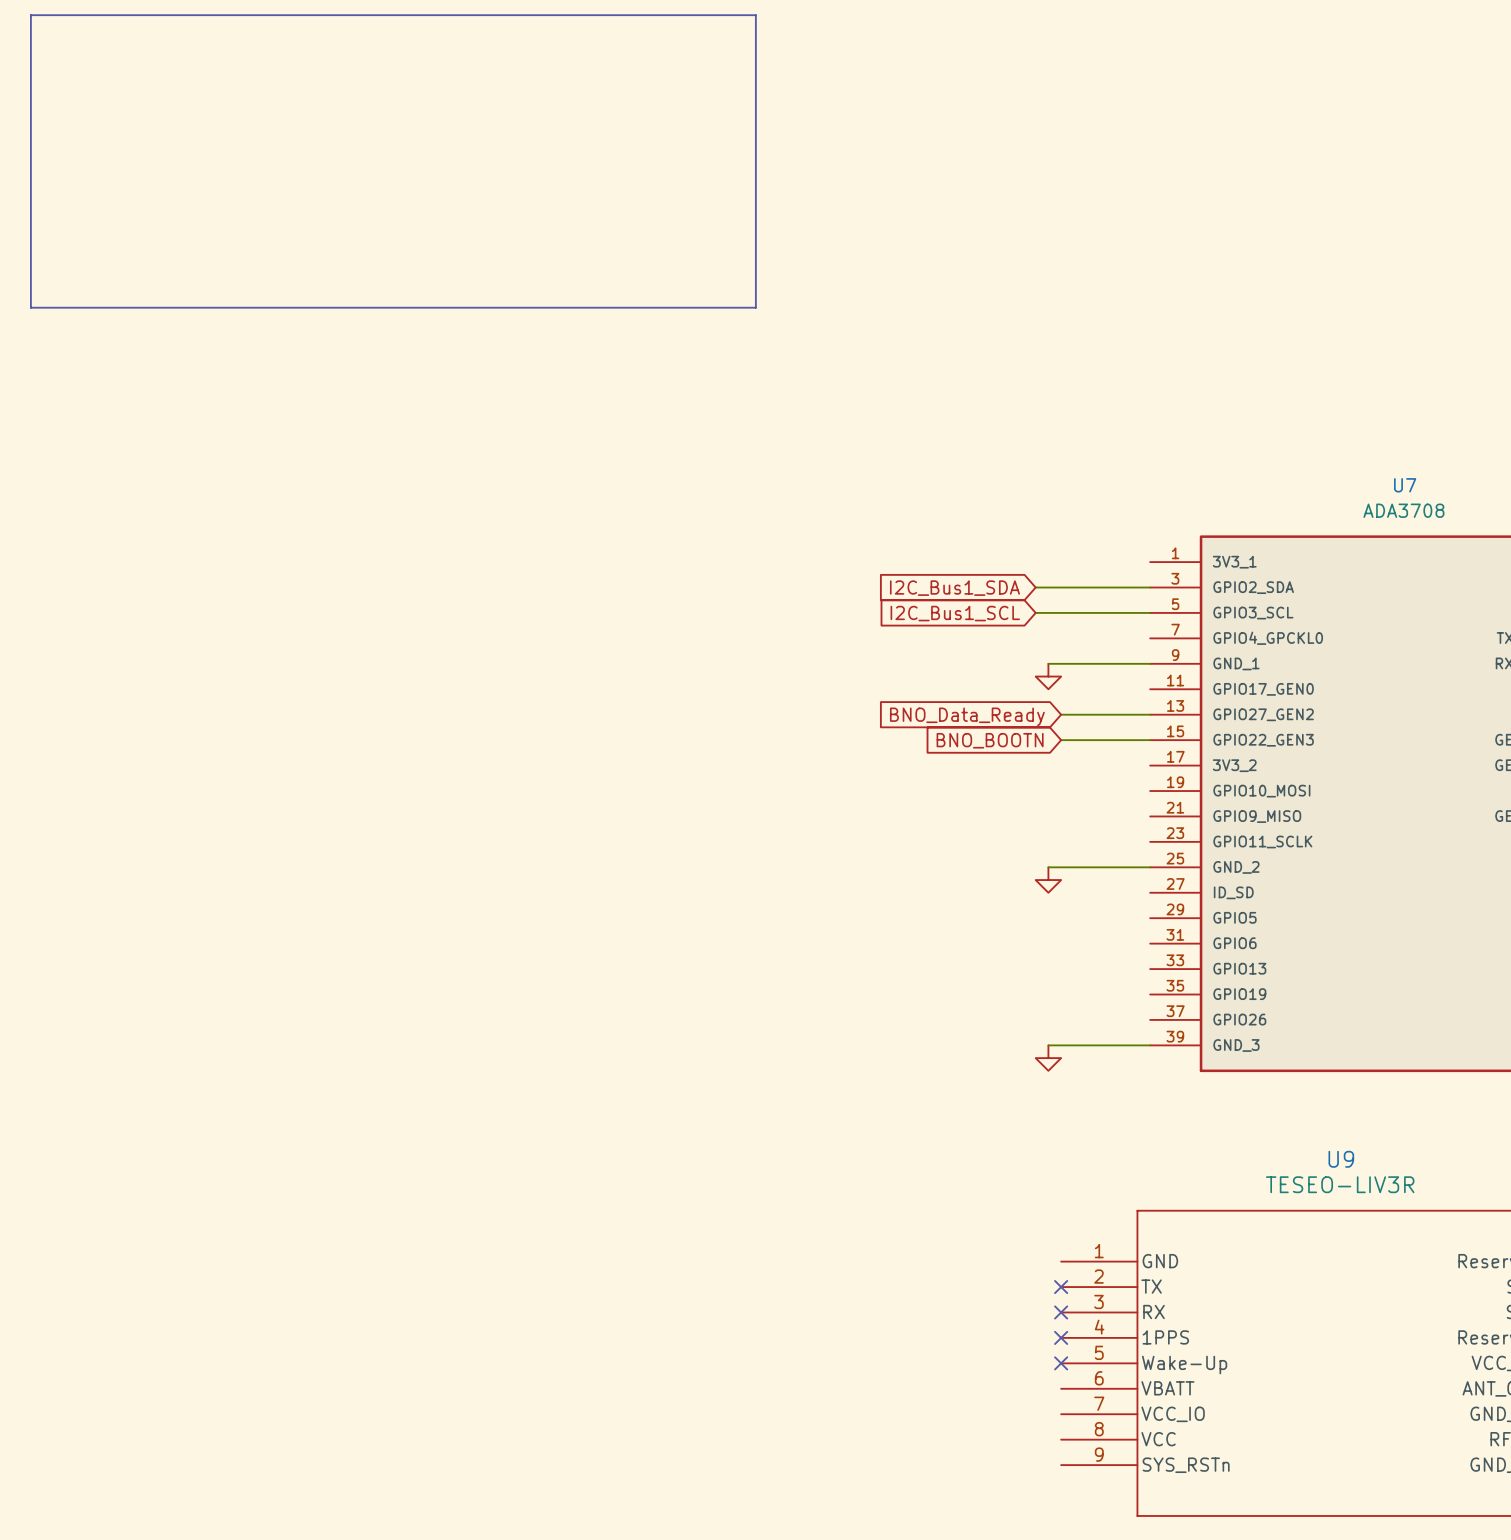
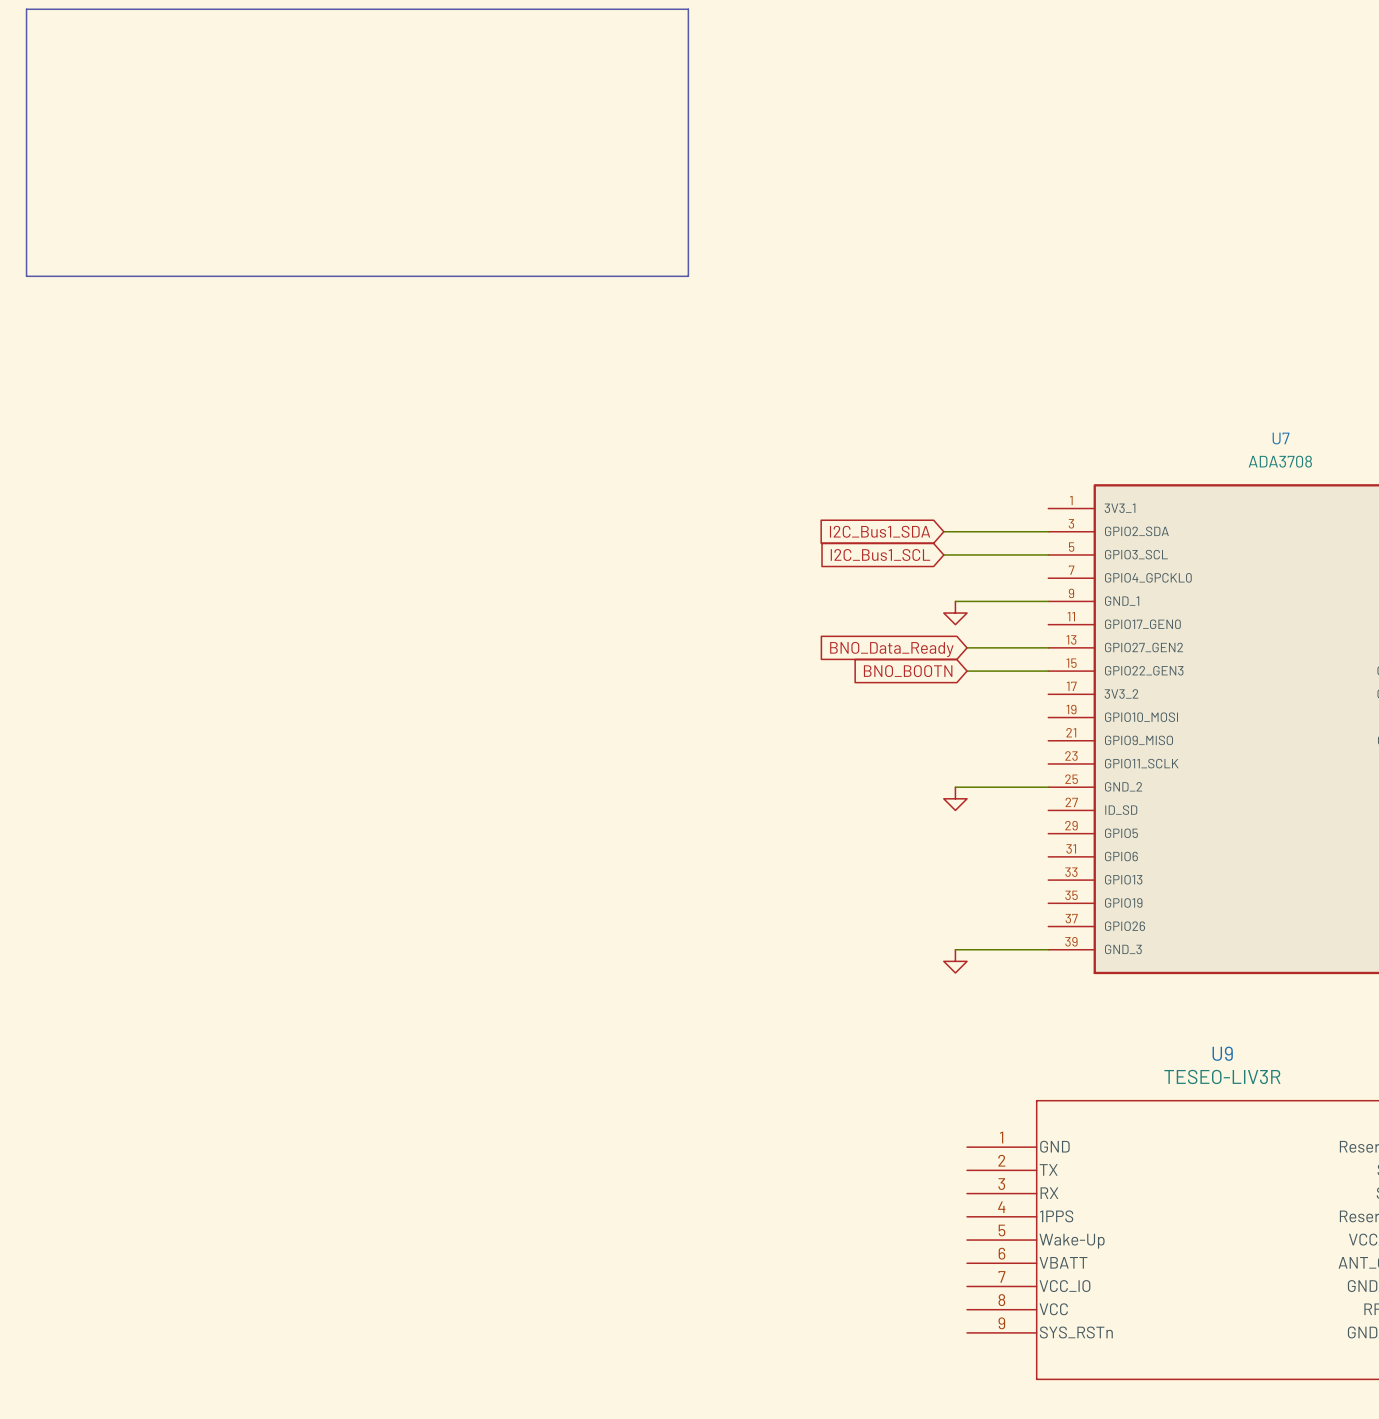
no-connect mark: (1061, 1287) -> none
no-connect mark: (1061, 1312) -> none
no-connect mark: (1061, 1337) -> none
no-connect mark: (1061, 1363) -> none

